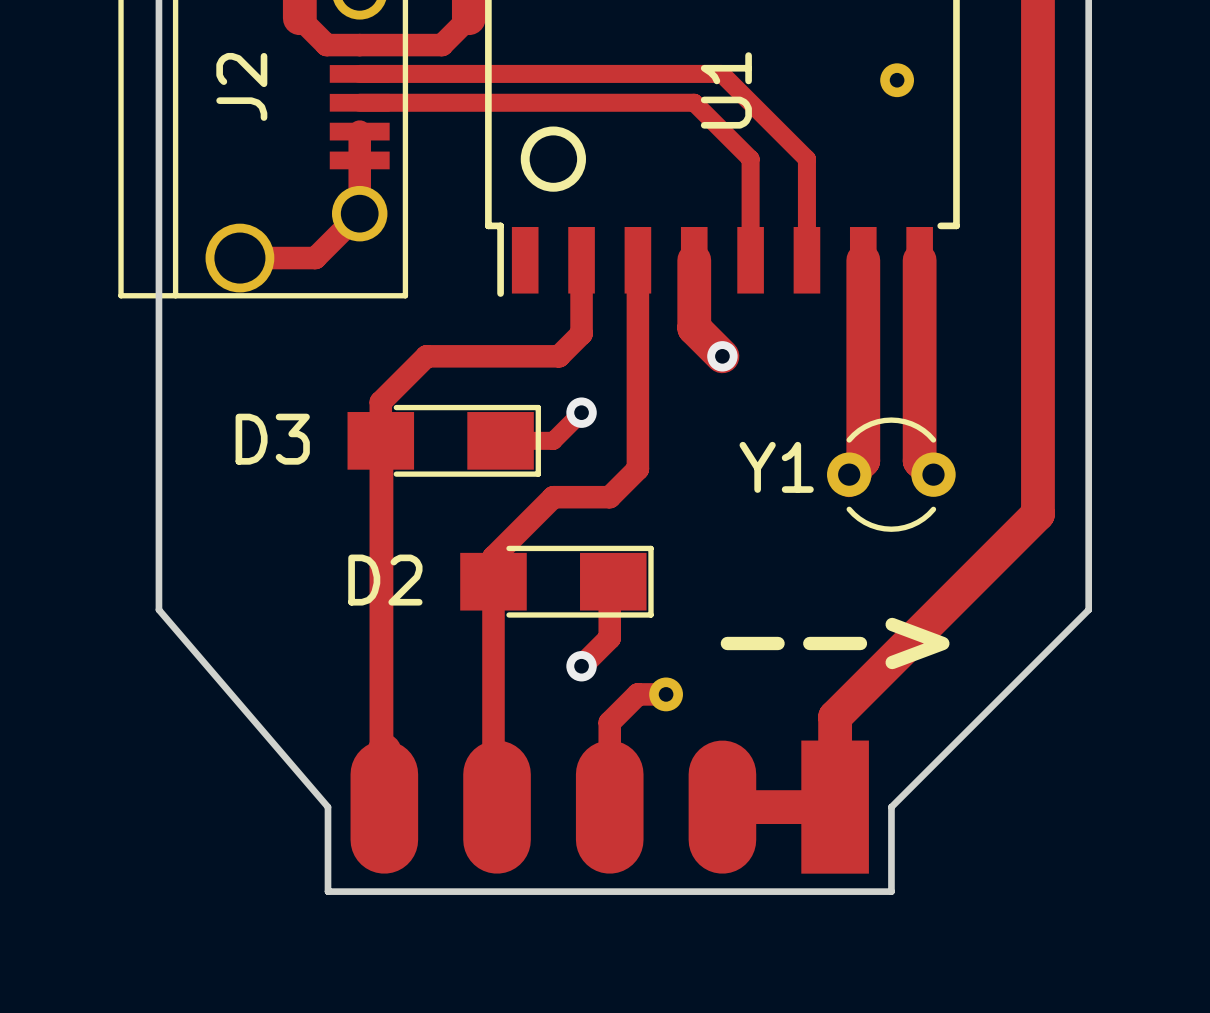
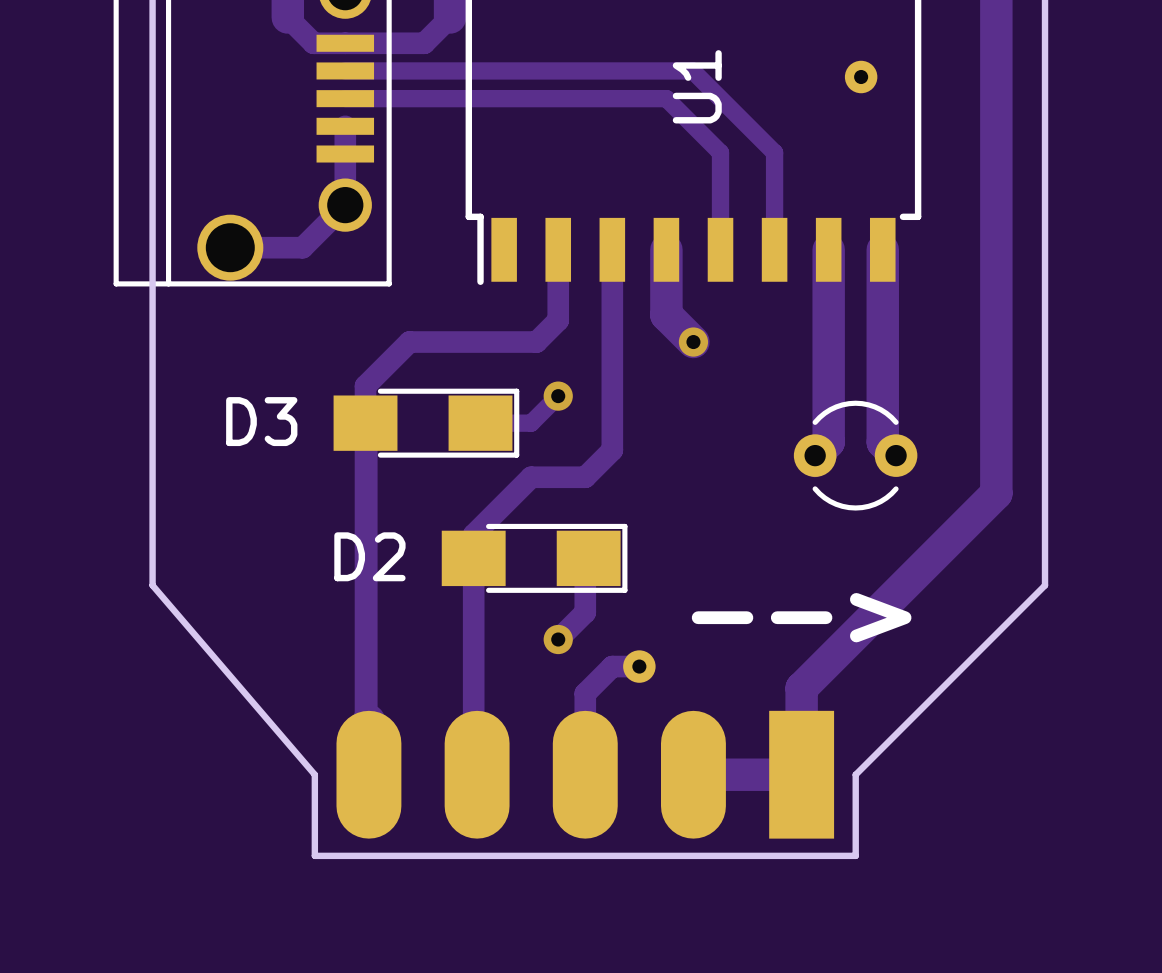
J2 name: J2 (241, 86) -> none
drawing: [520, 126, 586, 192] -> none
Y1 name: Y1 (776, 467) -> none

